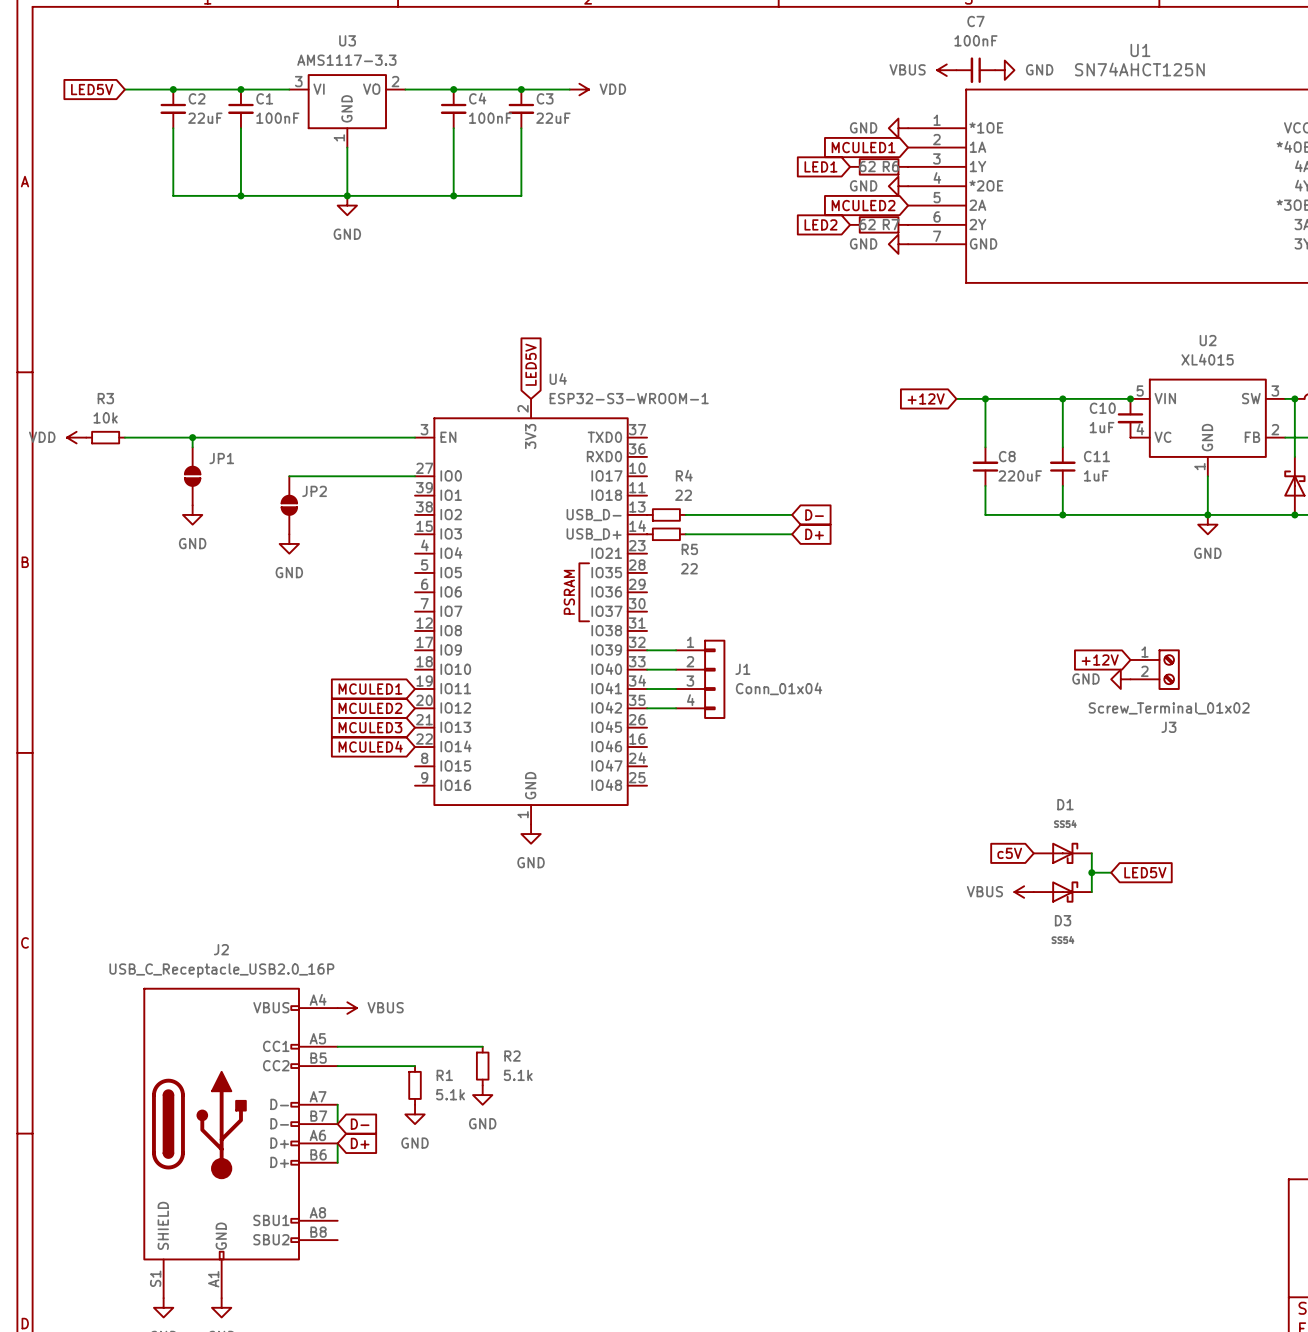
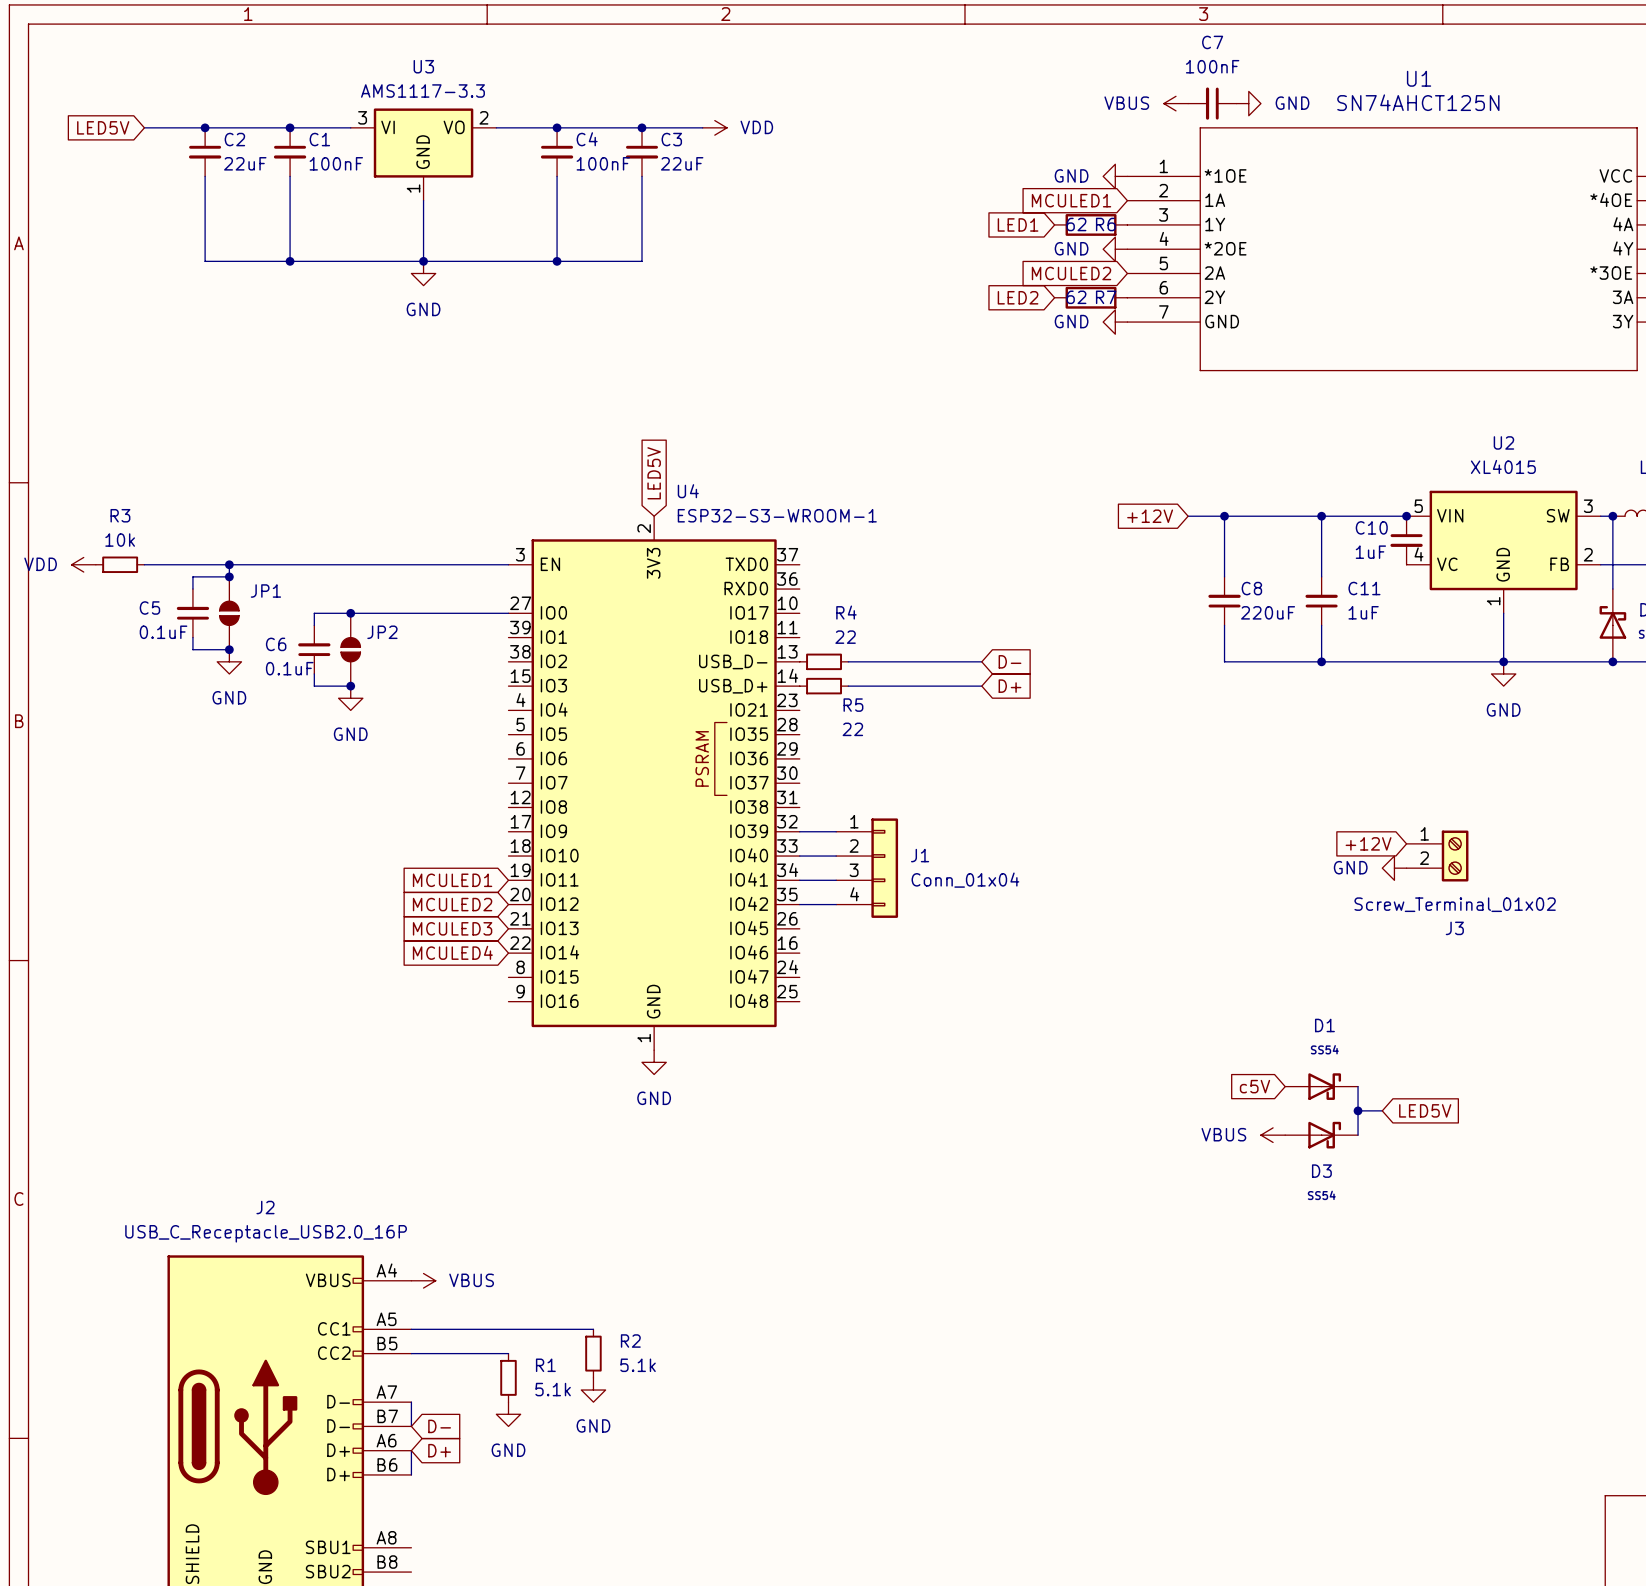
wire: none -> (229, 576) (192, 576) (192, 589)
junction: none -> (229, 576)
C5: none -> 0.1uF (192, 613)
wire: none -> (350, 613) (314, 613) (314, 625)
junction: none -> (350, 613)
wire: none -> (192, 637) (192, 649) (229, 649)
junction: none -> (229, 649)
C6: none -> 0.1uF (314, 649)
wire: none -> (314, 673) (314, 686) (350, 686)
junction: none -> (350, 686)

